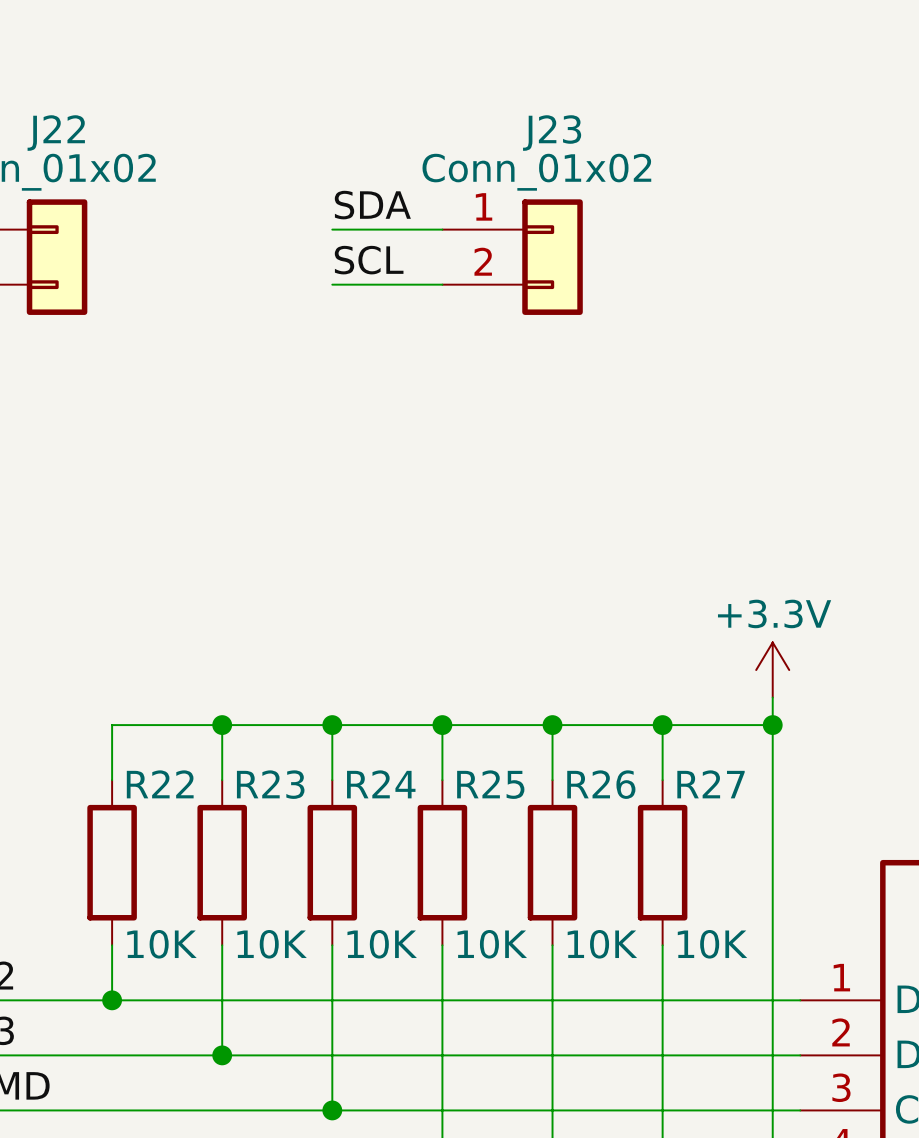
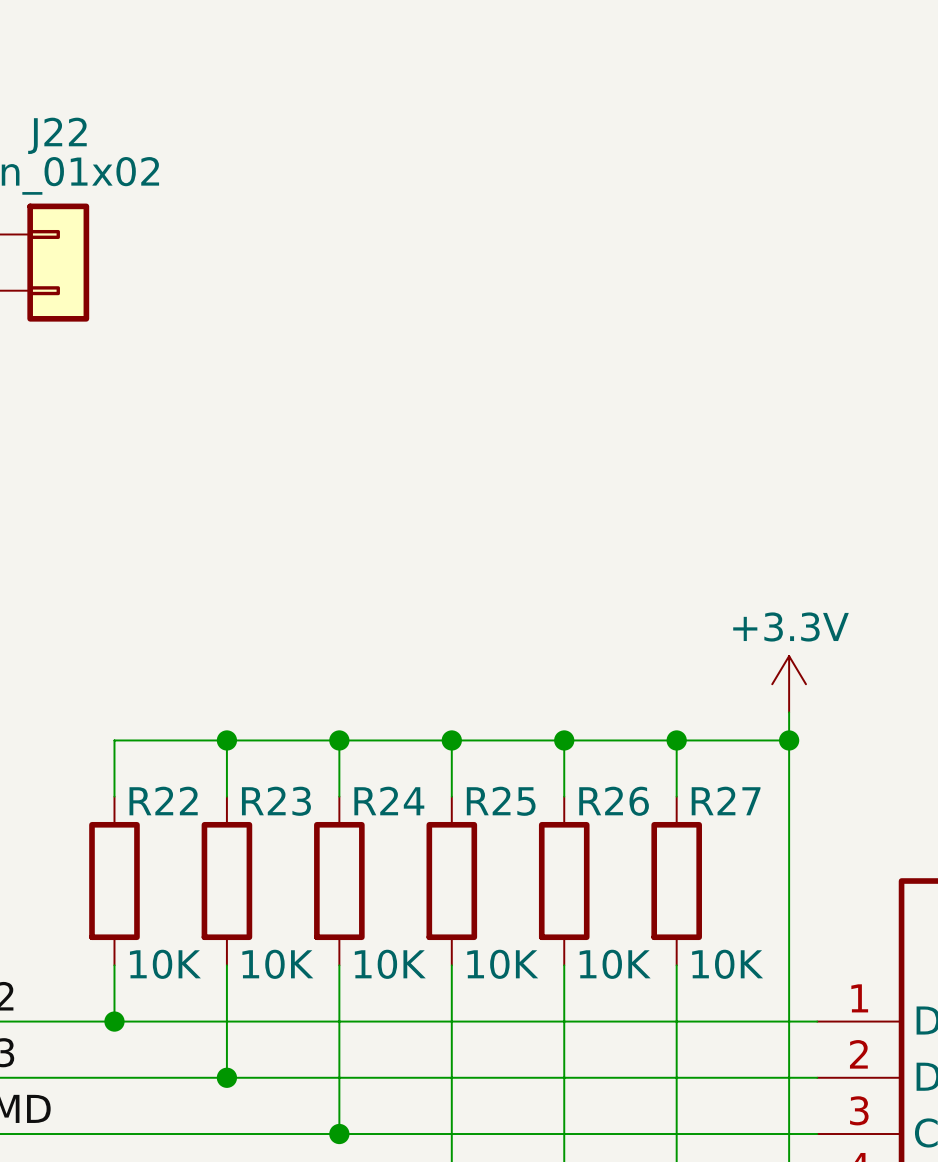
label: SDA (372, 205) -> none
wire: (332, 229) (442, 229) -> none
J23: Conn_01x02 (512, 257) -> none
label: SCL (369, 260) -> none
wire: (332, 284) (442, 284) -> none

